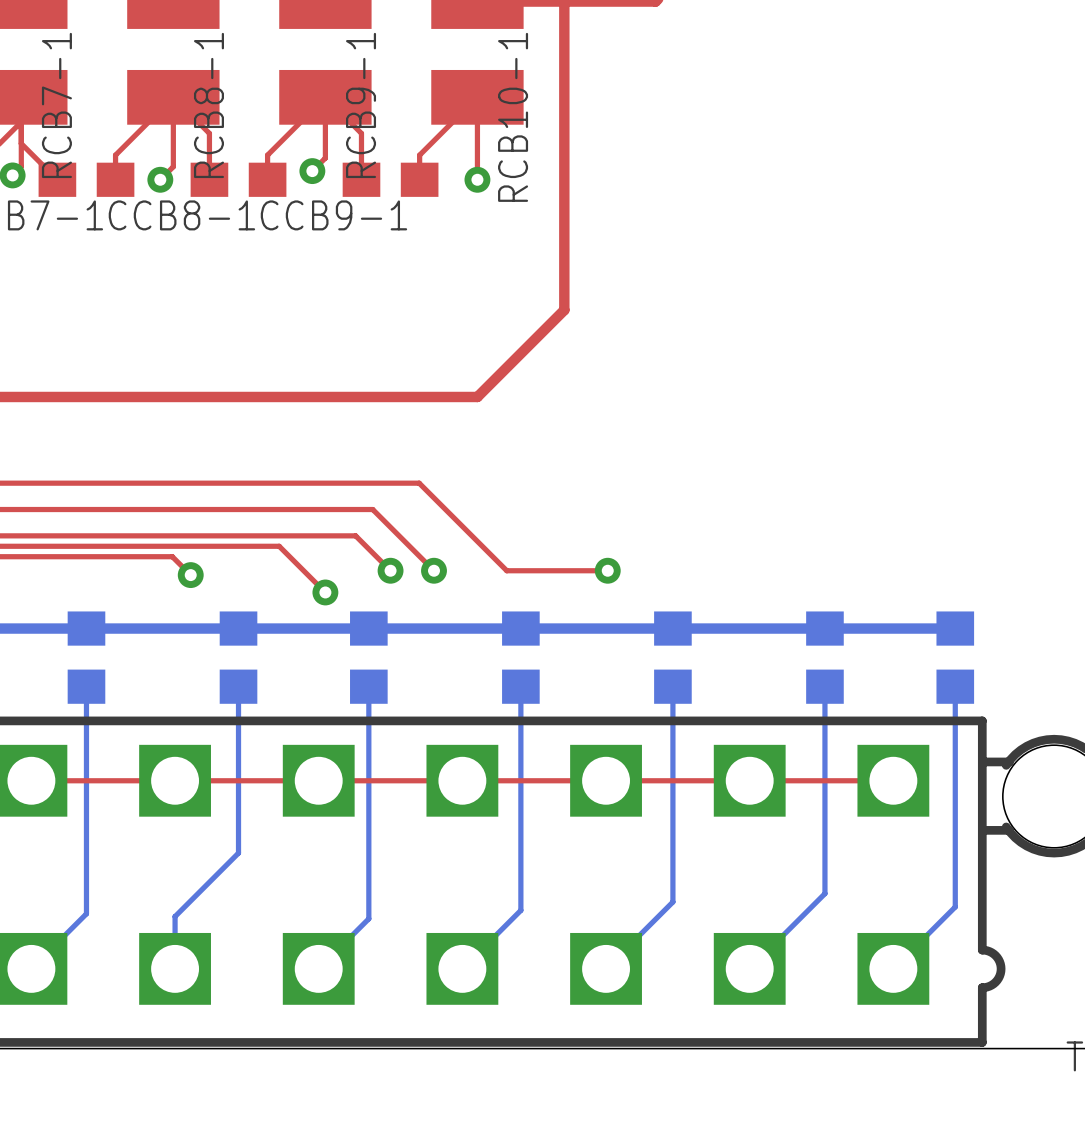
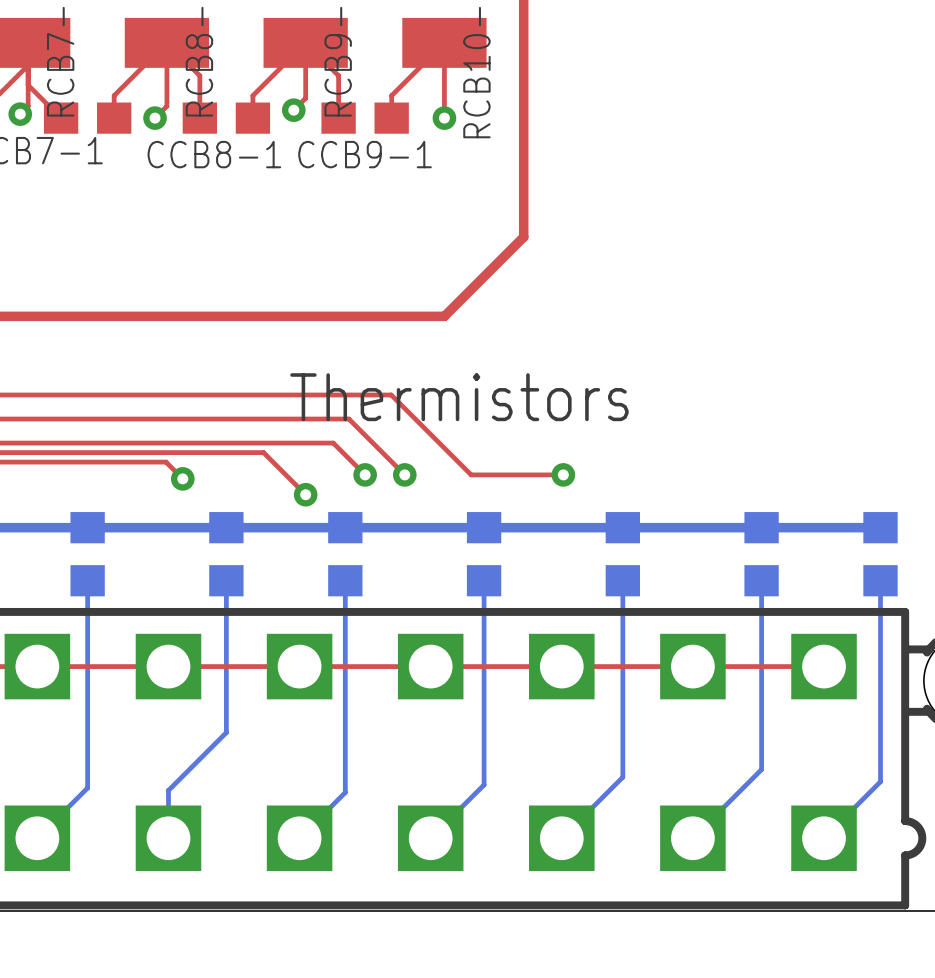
CCB8-1 name position: CCB8-1 (181, 215) -> CCB8-1 (214, 154)
CCB9-1 name position: CCB9-1 (333, 215) -> CCB9-1 (365, 154)
text: none -> Thermistors (459, 397)

